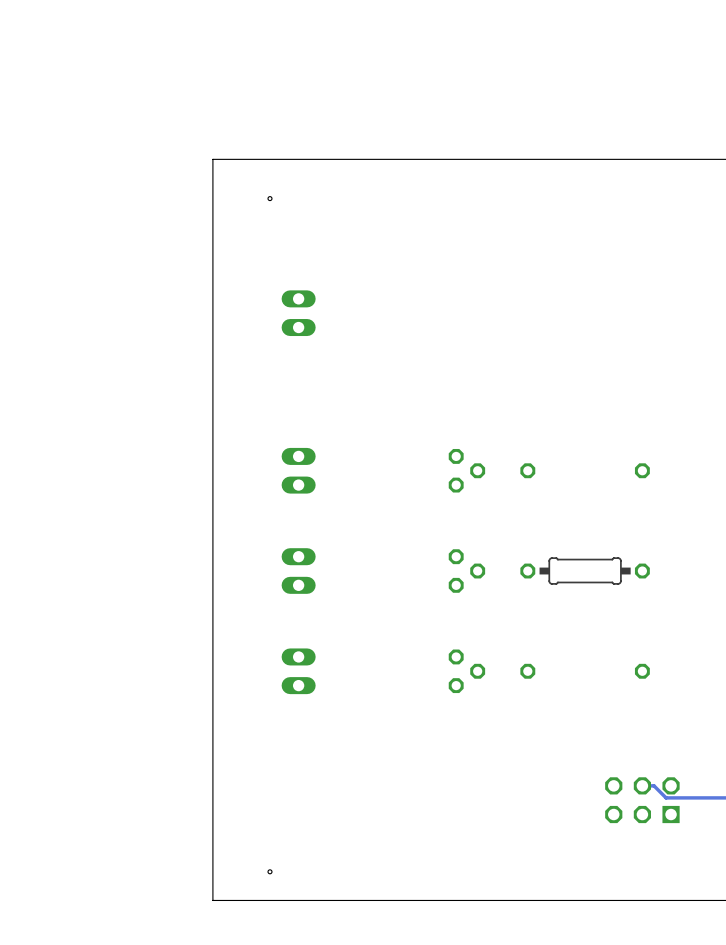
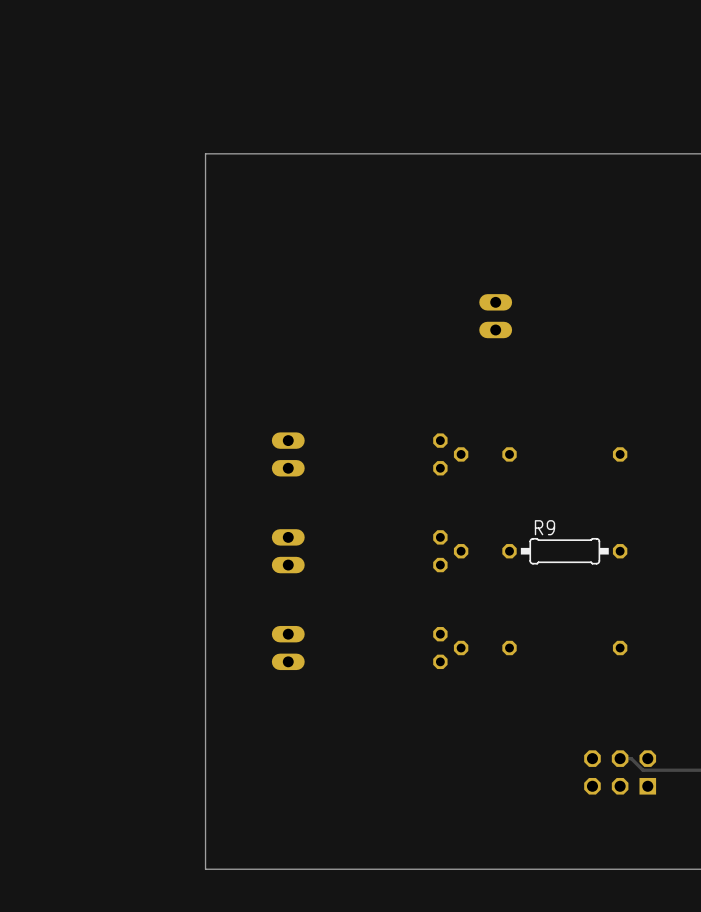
hole: (269, 198) -> none
part position: (298, 313) -> (495, 316)
R9 name: none -> R9 (544, 527)
hole: (269, 871) -> none

